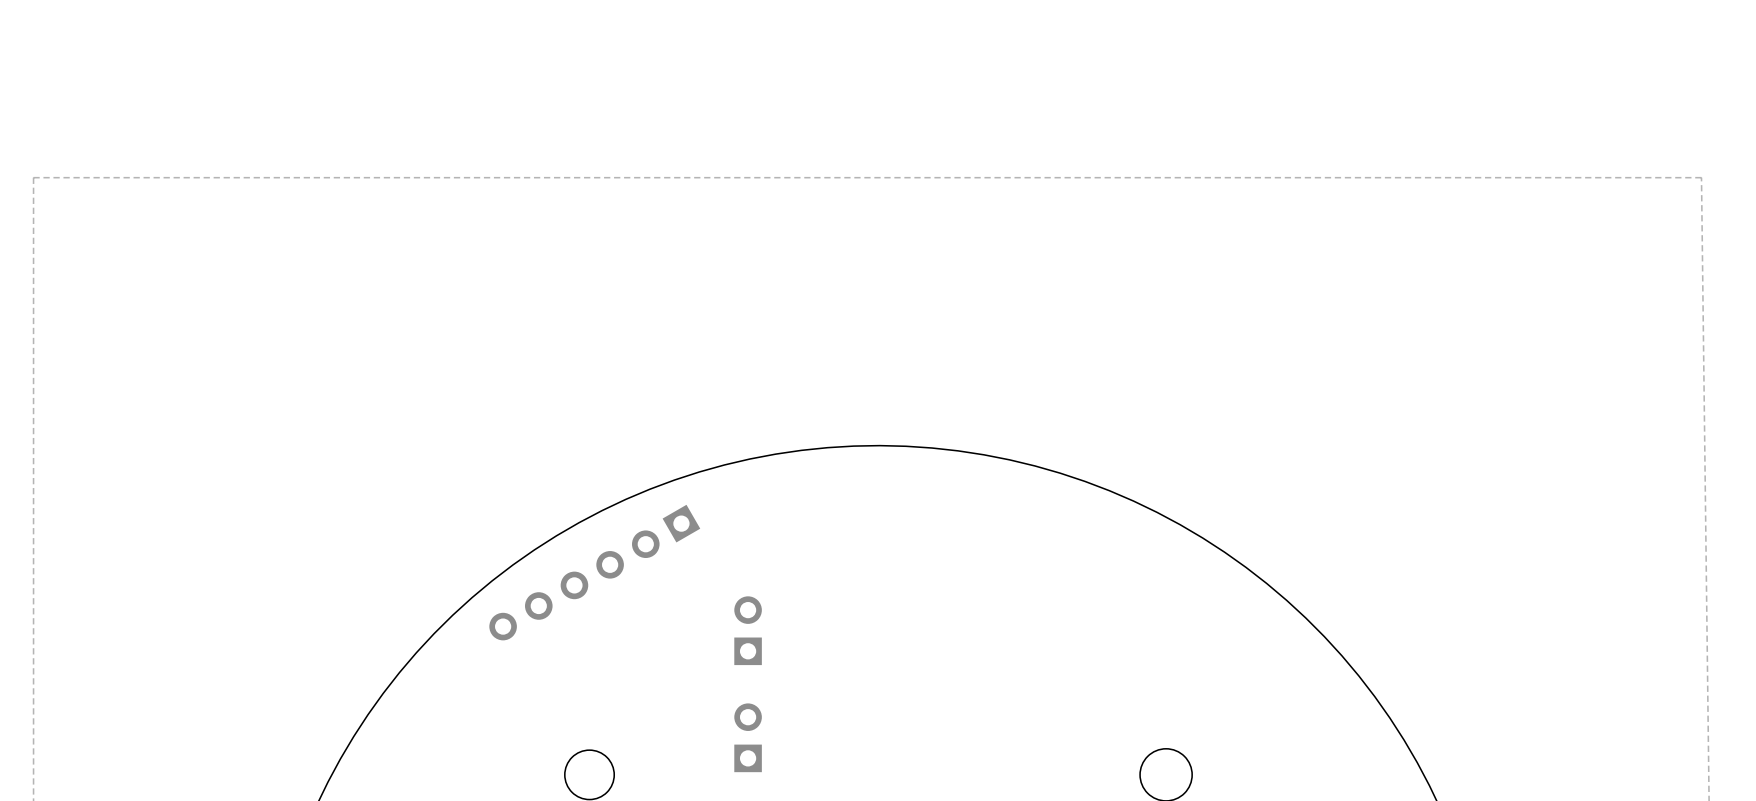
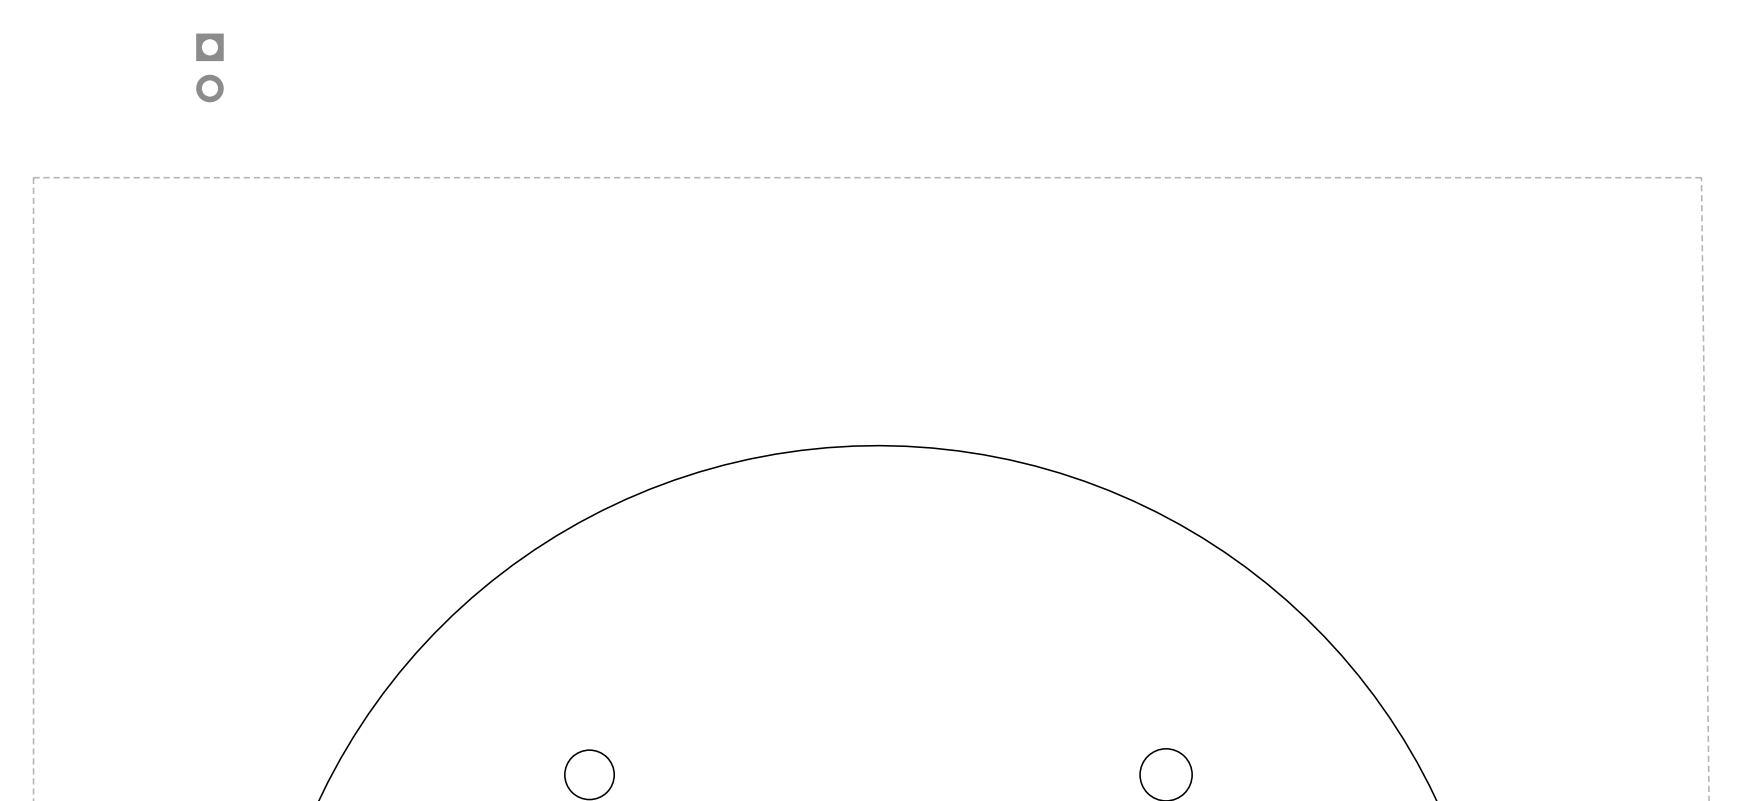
part: none -> (209, 67)
part: (594, 572) -> none
part: (748, 630) -> none
part: (748, 737) -> none

